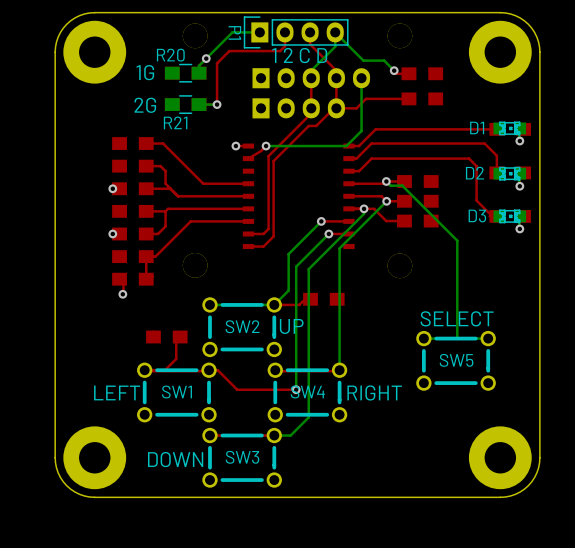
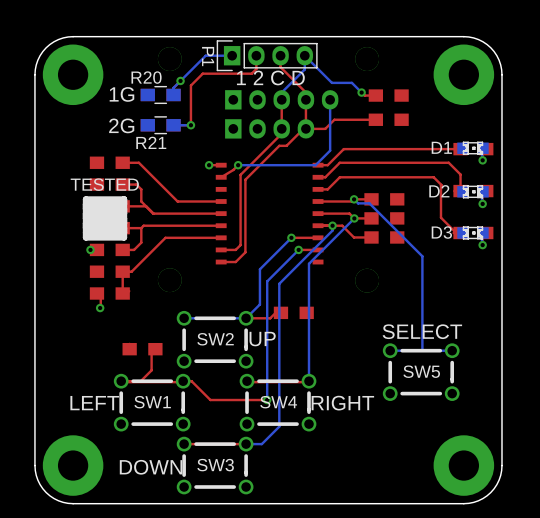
TESTED: none -> (105, 218)

